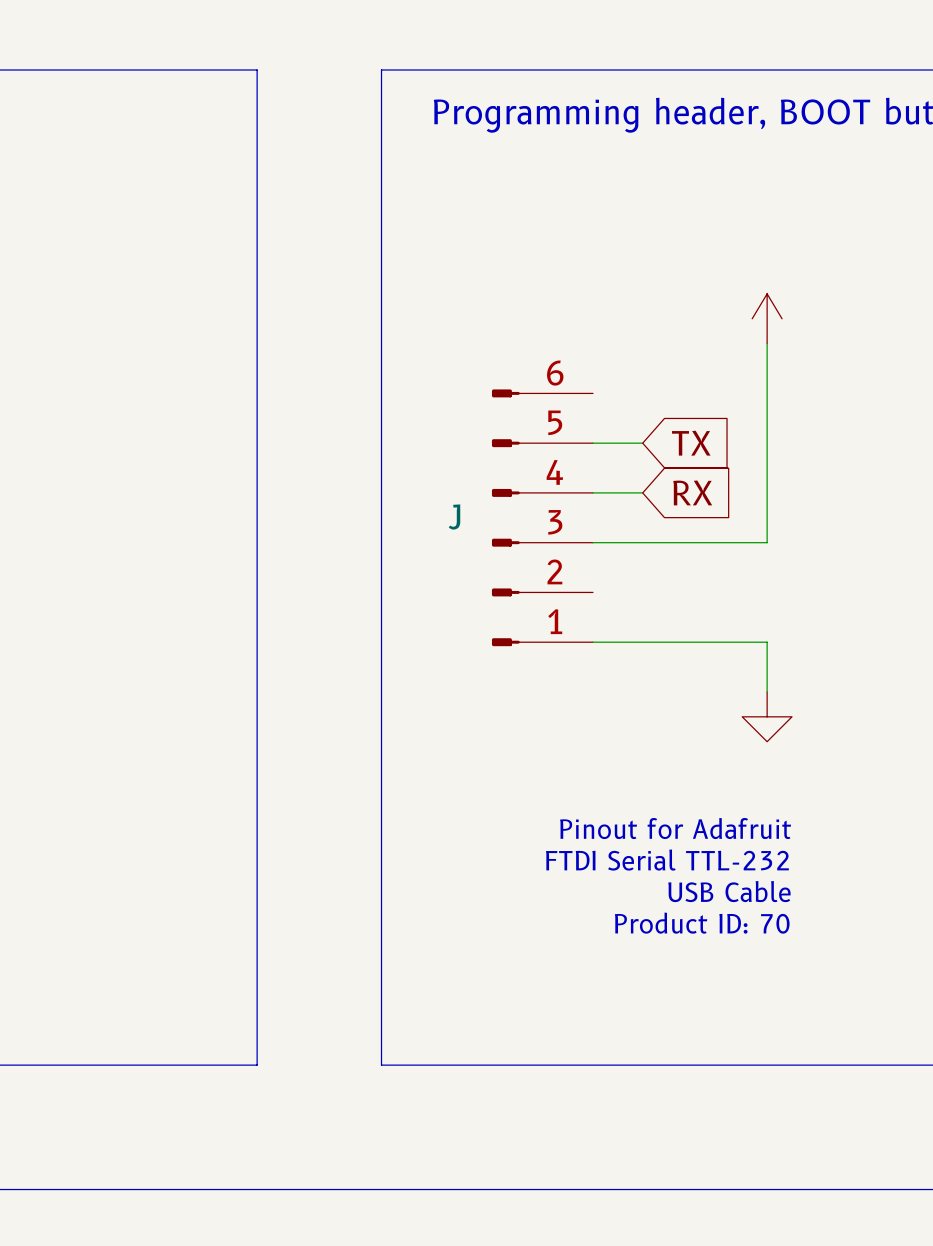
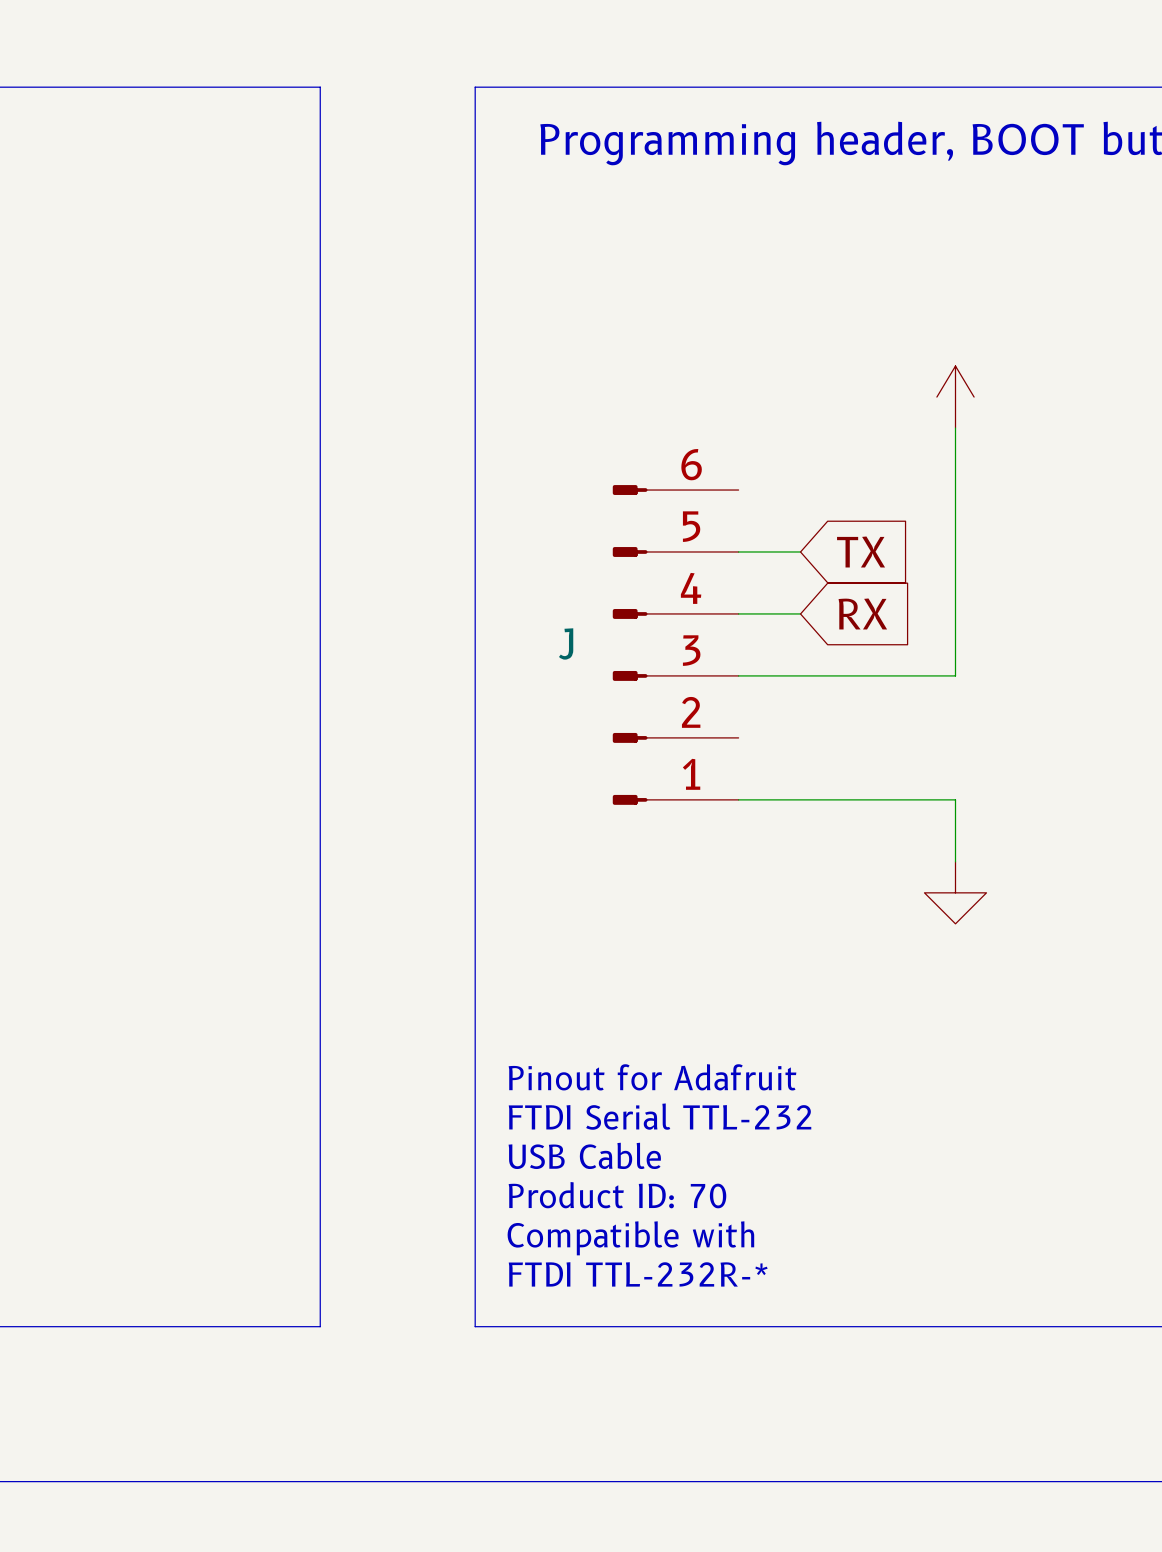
text position: Pinout for Adafruit (675, 828) -> Pinout for Adafruit (652, 1077)
text position: FTDI Serial TTL-232 (667, 860) -> FTDI Serial TTL-232 (660, 1116)
text position: USB Cable (729, 891) -> USB Cable (584, 1155)
text position: Product ID: 70 (702, 923) -> Product ID: 70 (617, 1195)
text: none -> Compatible with (630, 1238)
text: none -> FTDI TTL-232R-* (638, 1274)

